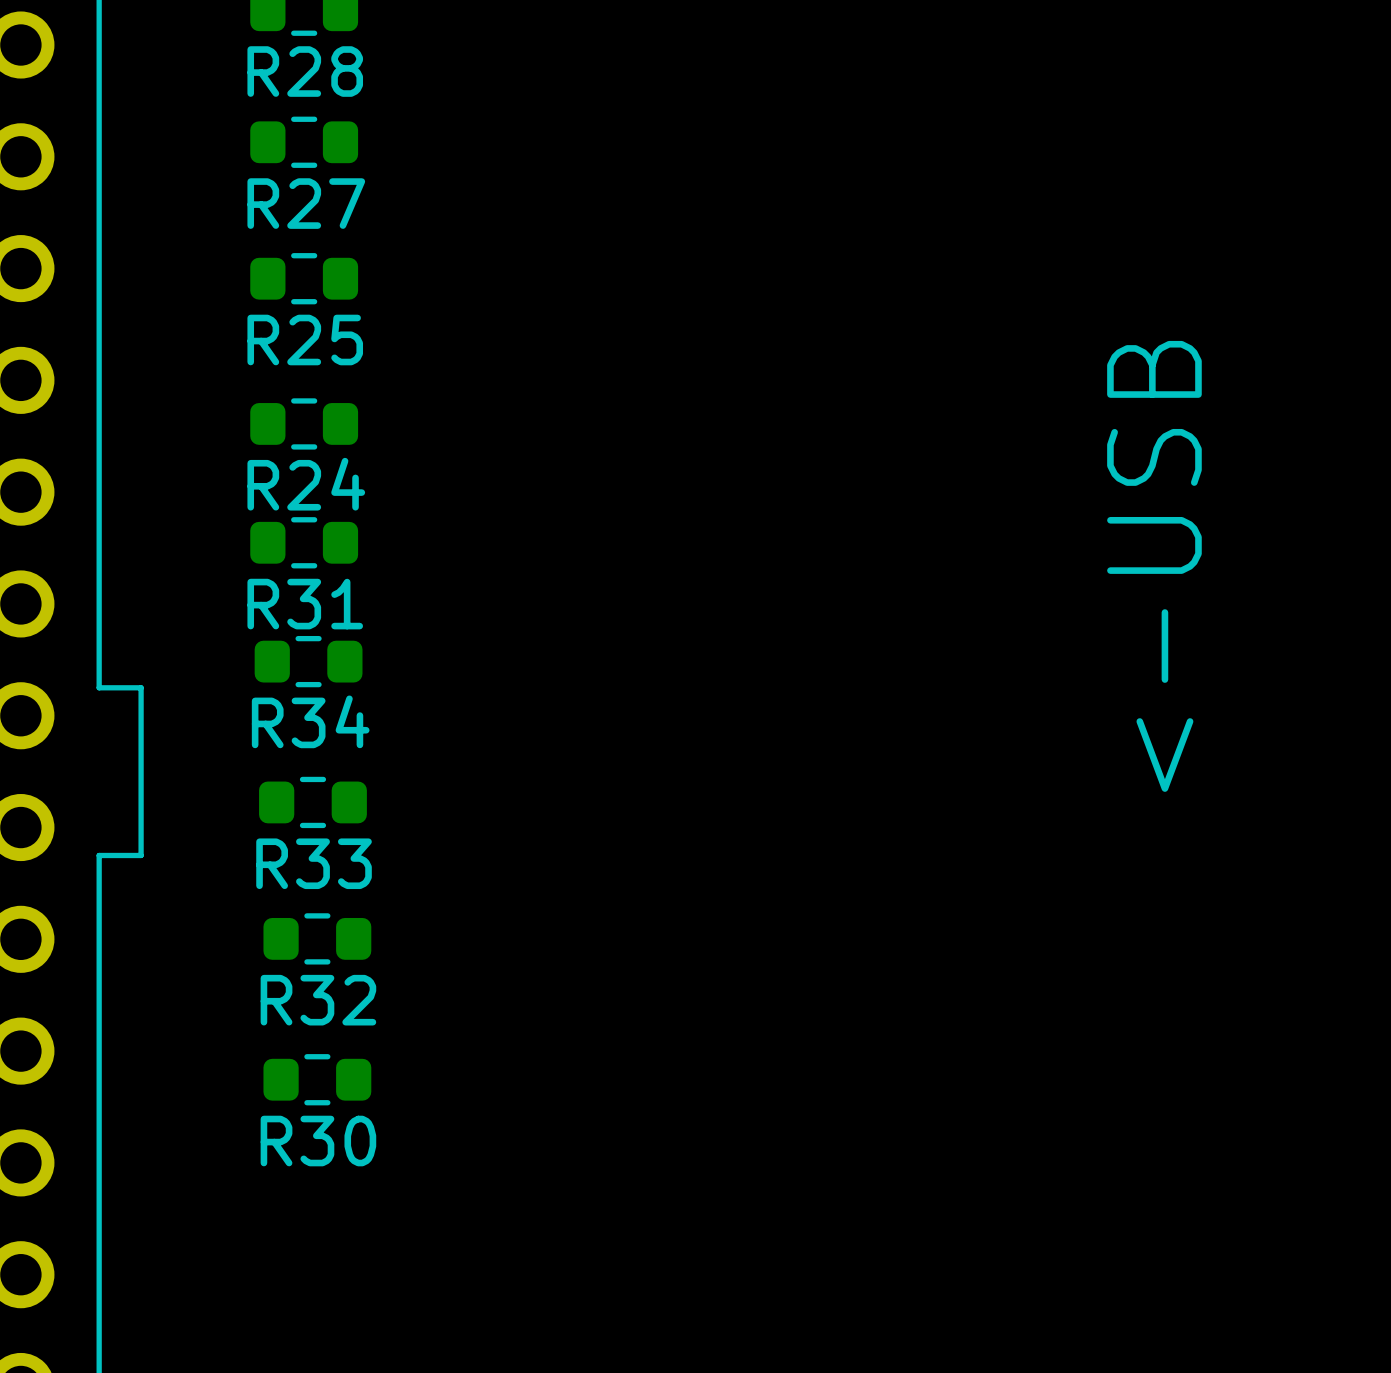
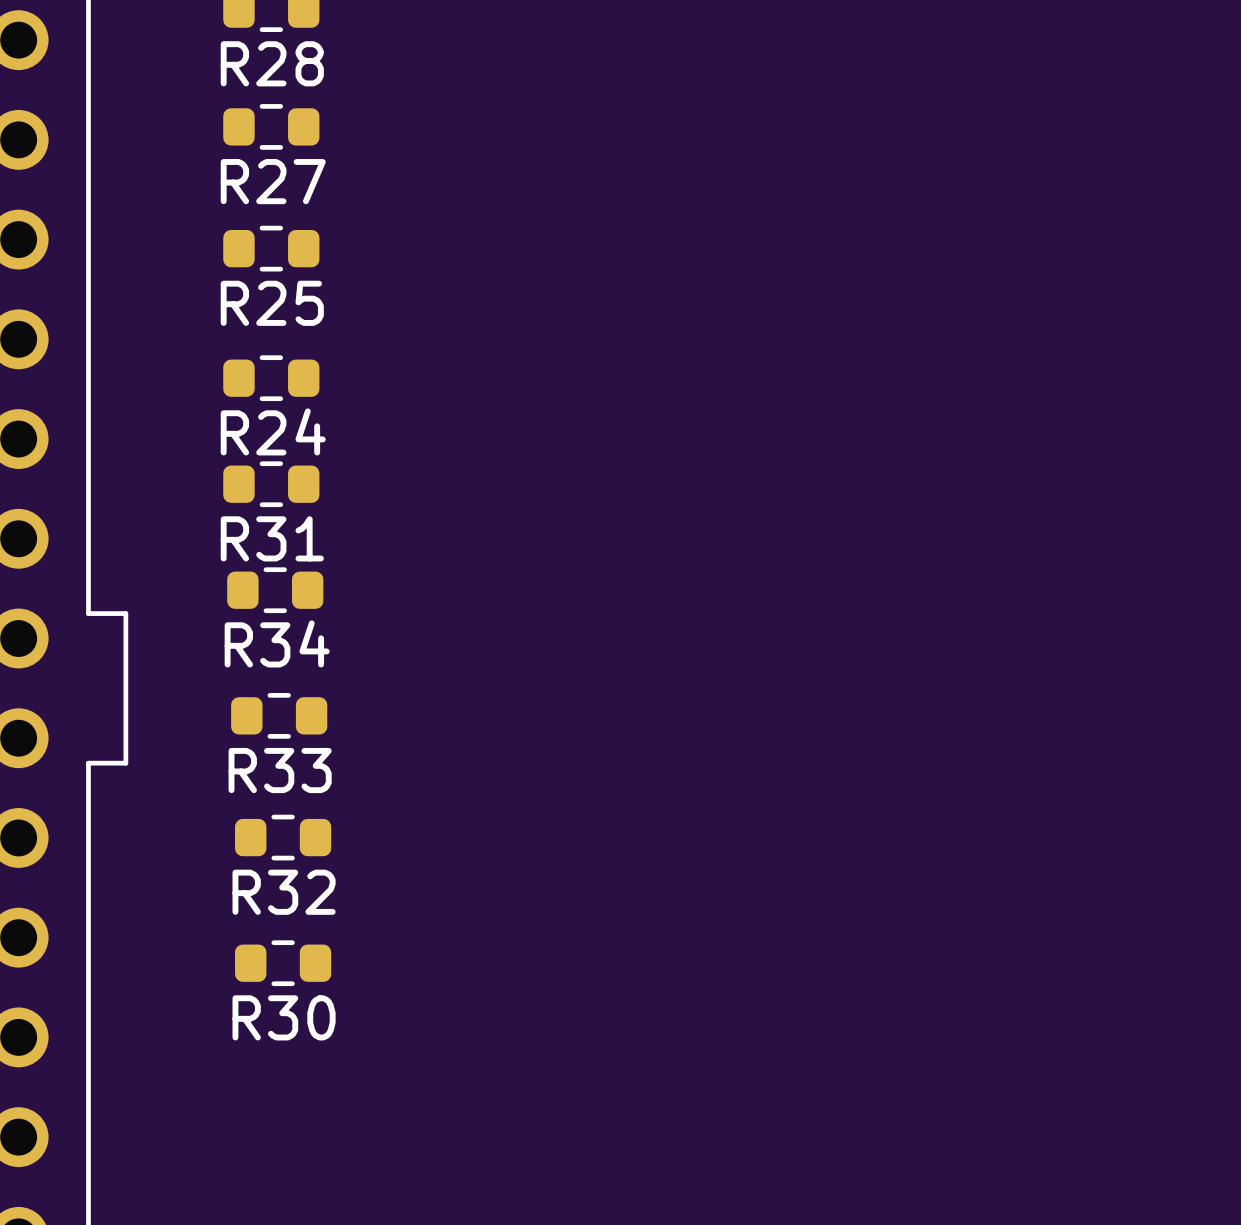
text: <-USB (1154, 566) -> none

